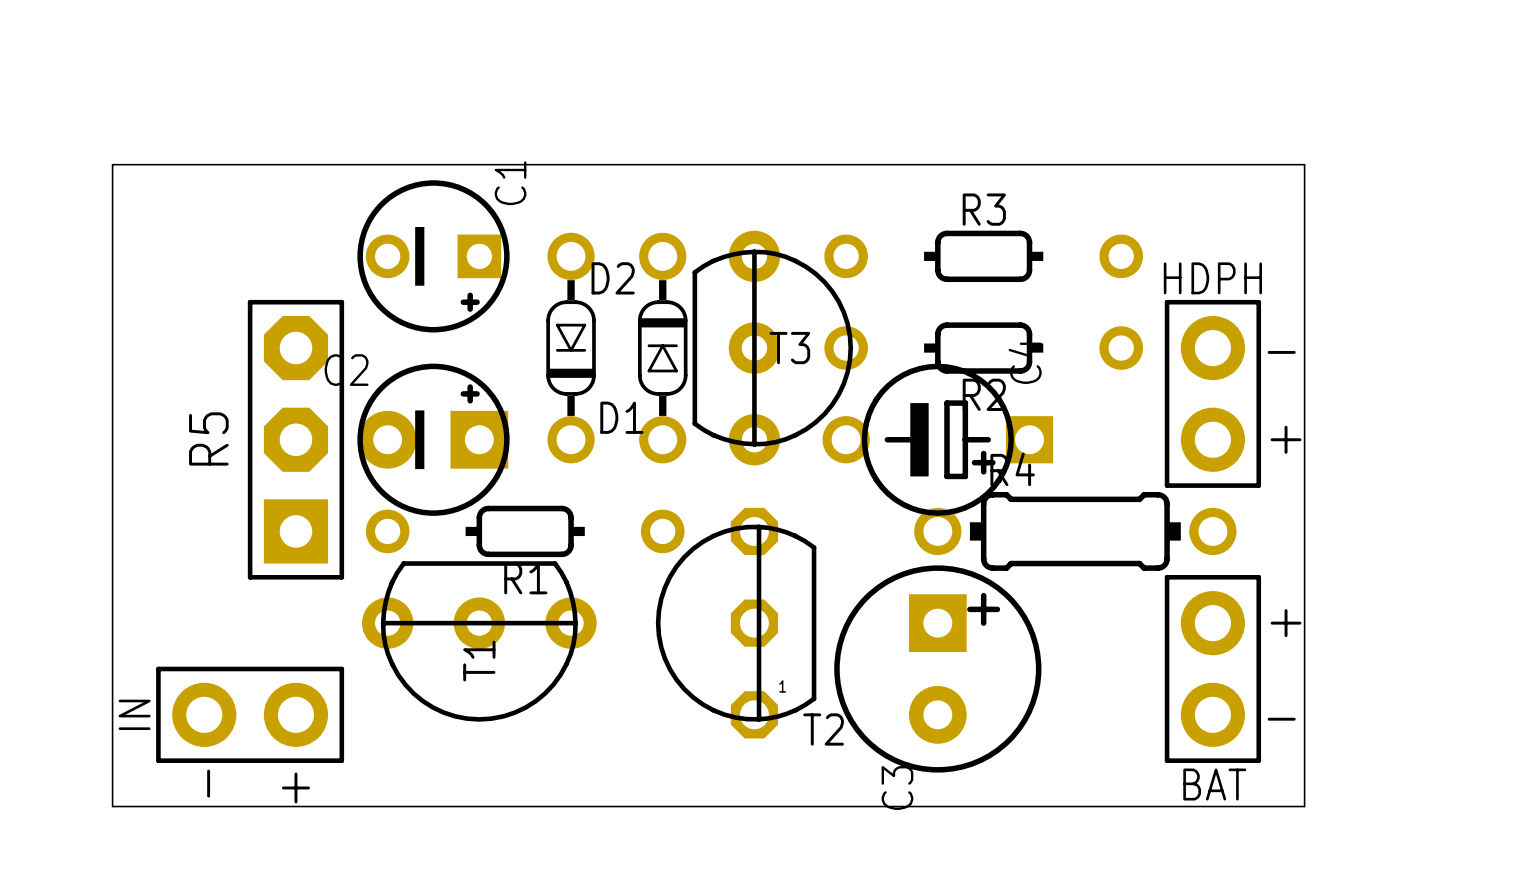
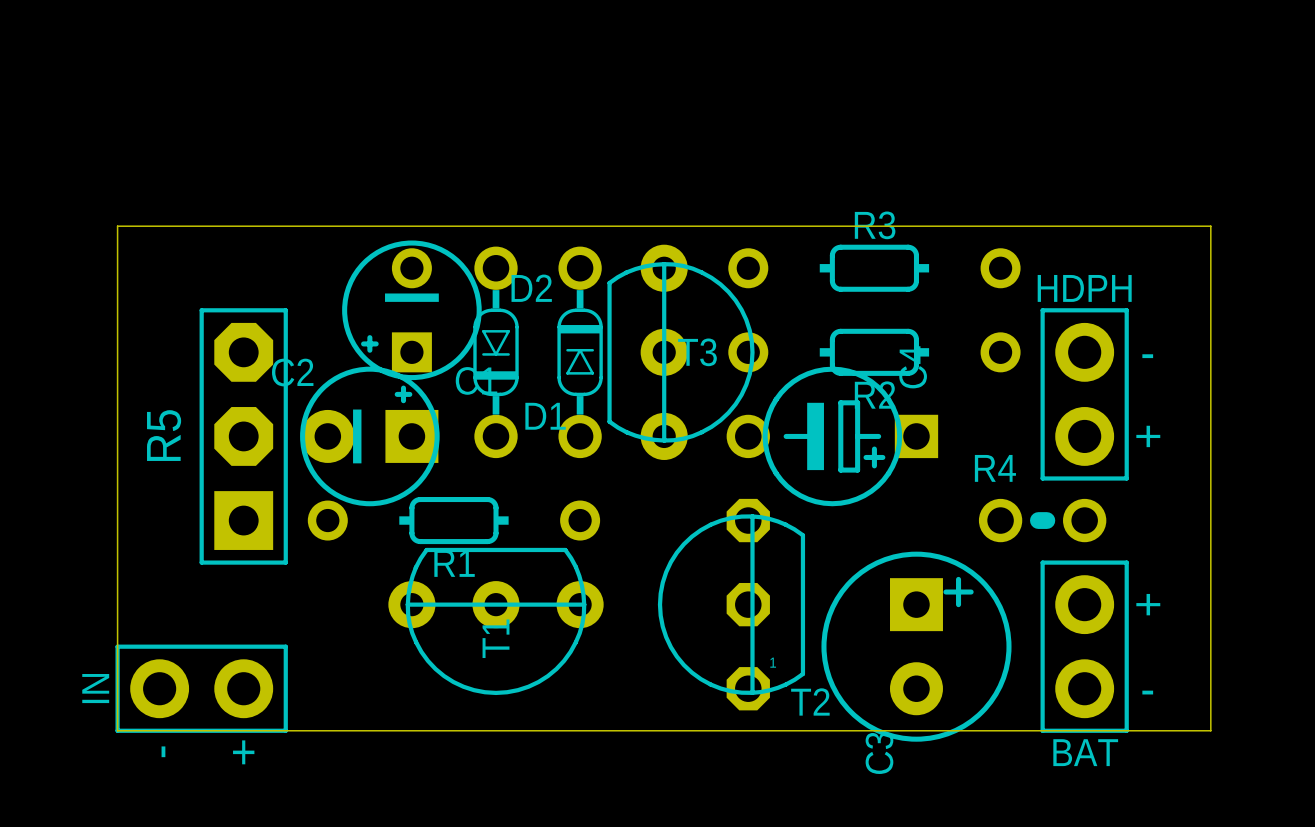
board edge: (112, 164) (1304, 164) (1304, 806) (112, 806) (112, 164) -> (117, 226) (117, 730) (1210, 730) (1210, 226) (117, 226)
C1 rotation: 0° (433, 256) -> 90° clockwise (411, 310)
R4 footprint: [914, 492, 1237, 571] -> [978, 498, 1107, 543]
T2 position: (736, 623) -> (731, 604)
T1 position: (479, 641) -> (496, 621)
C3 position: (937, 668) -> (916, 646)

